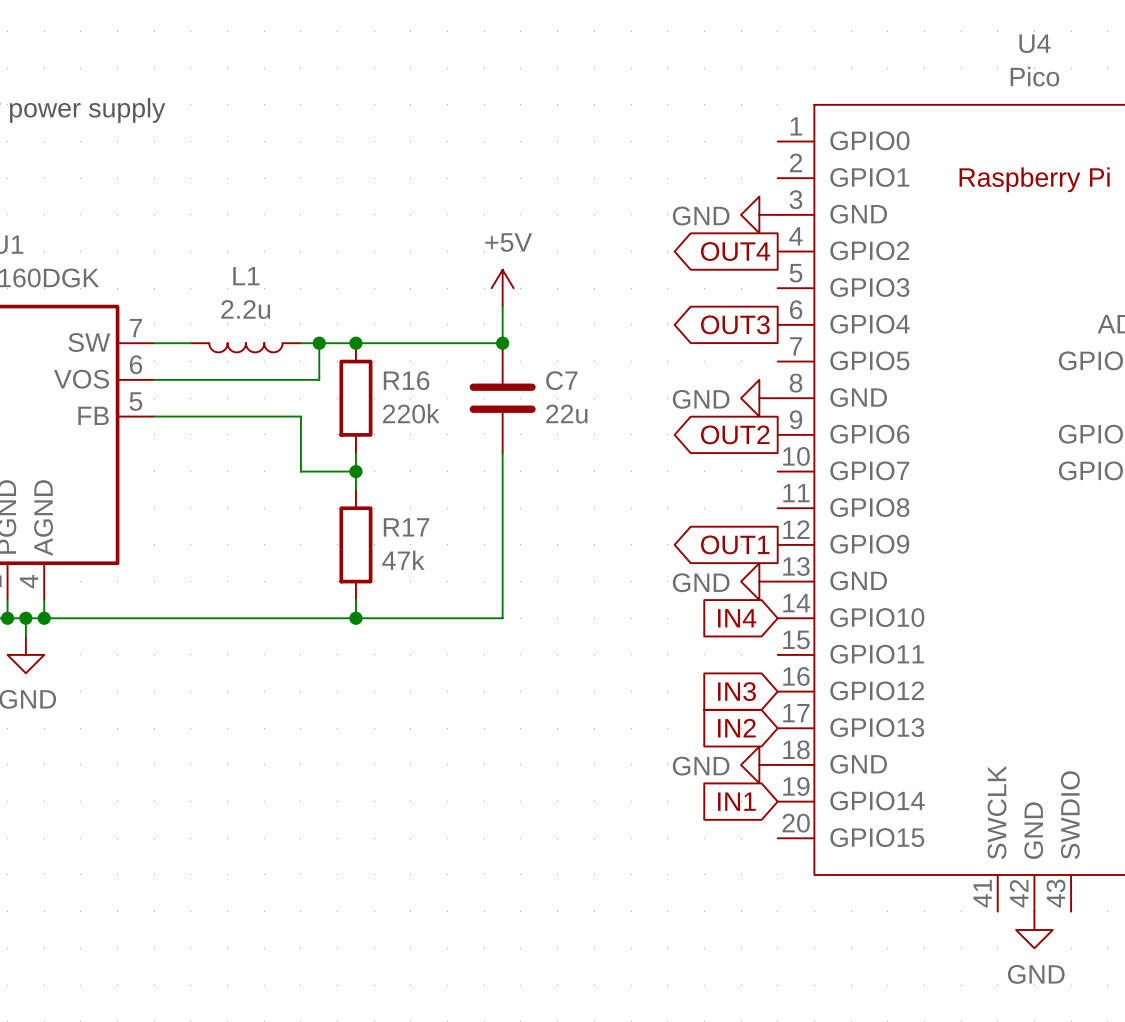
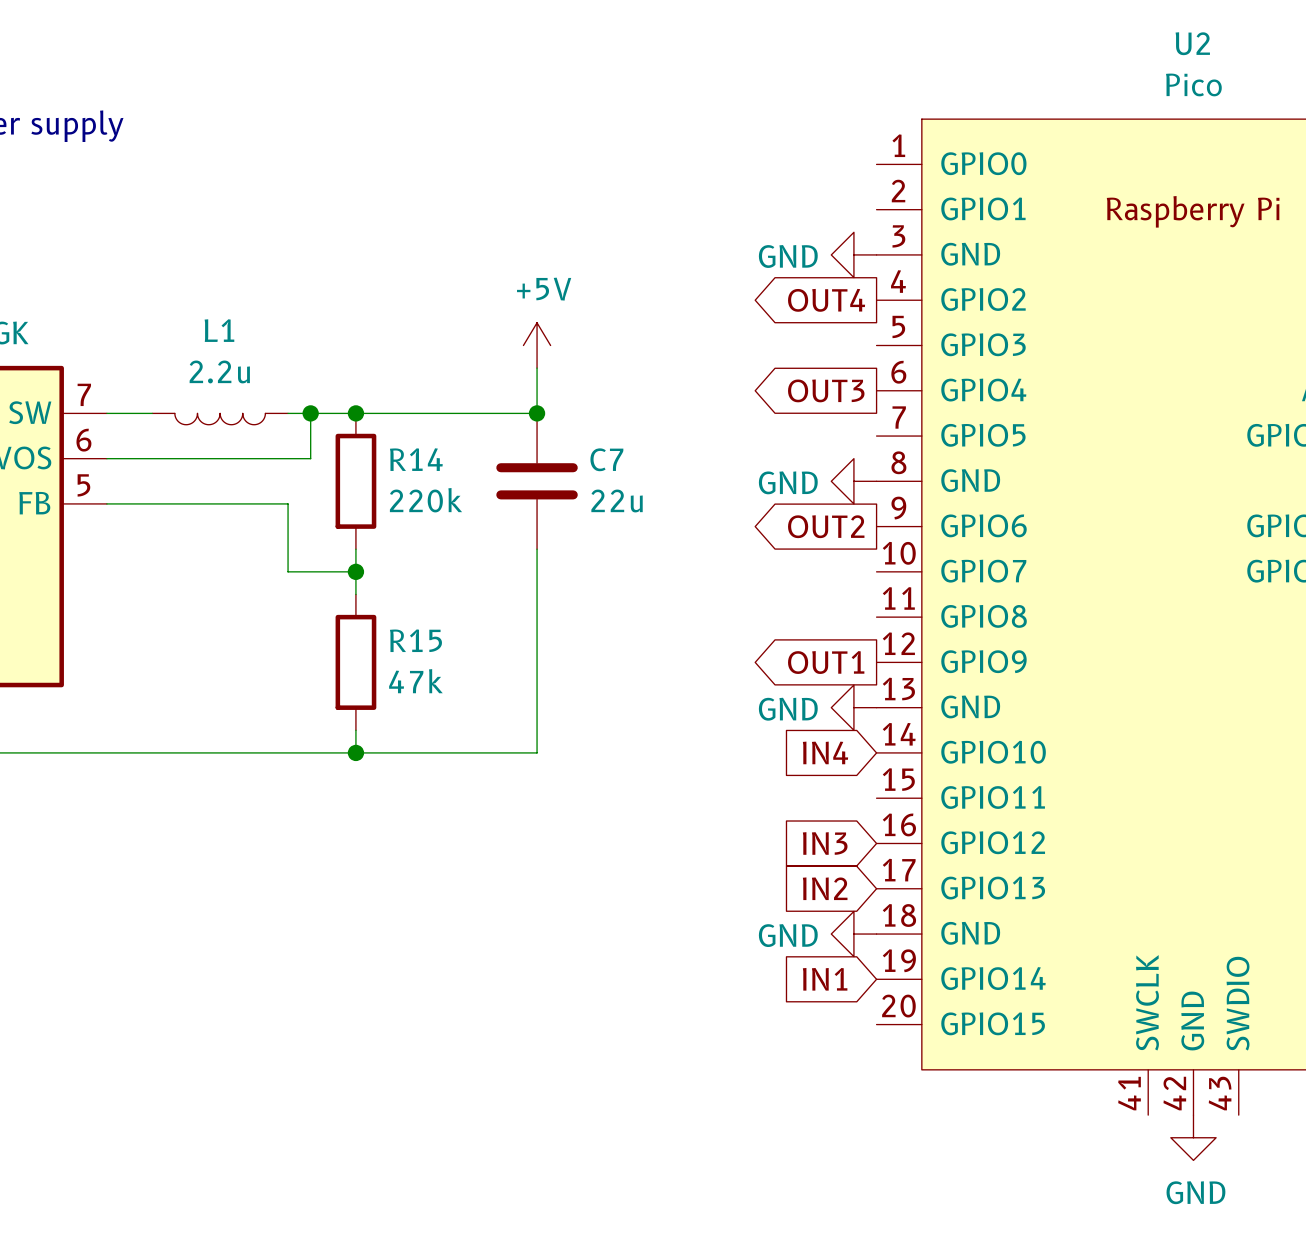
U4 name: U4 (1035, 43) -> U2 (1192, 43)
R16 name: R16 (406, 380) -> R14 (416, 459)
R17 name: R17 (406, 527) -> R15 (415, 640)

